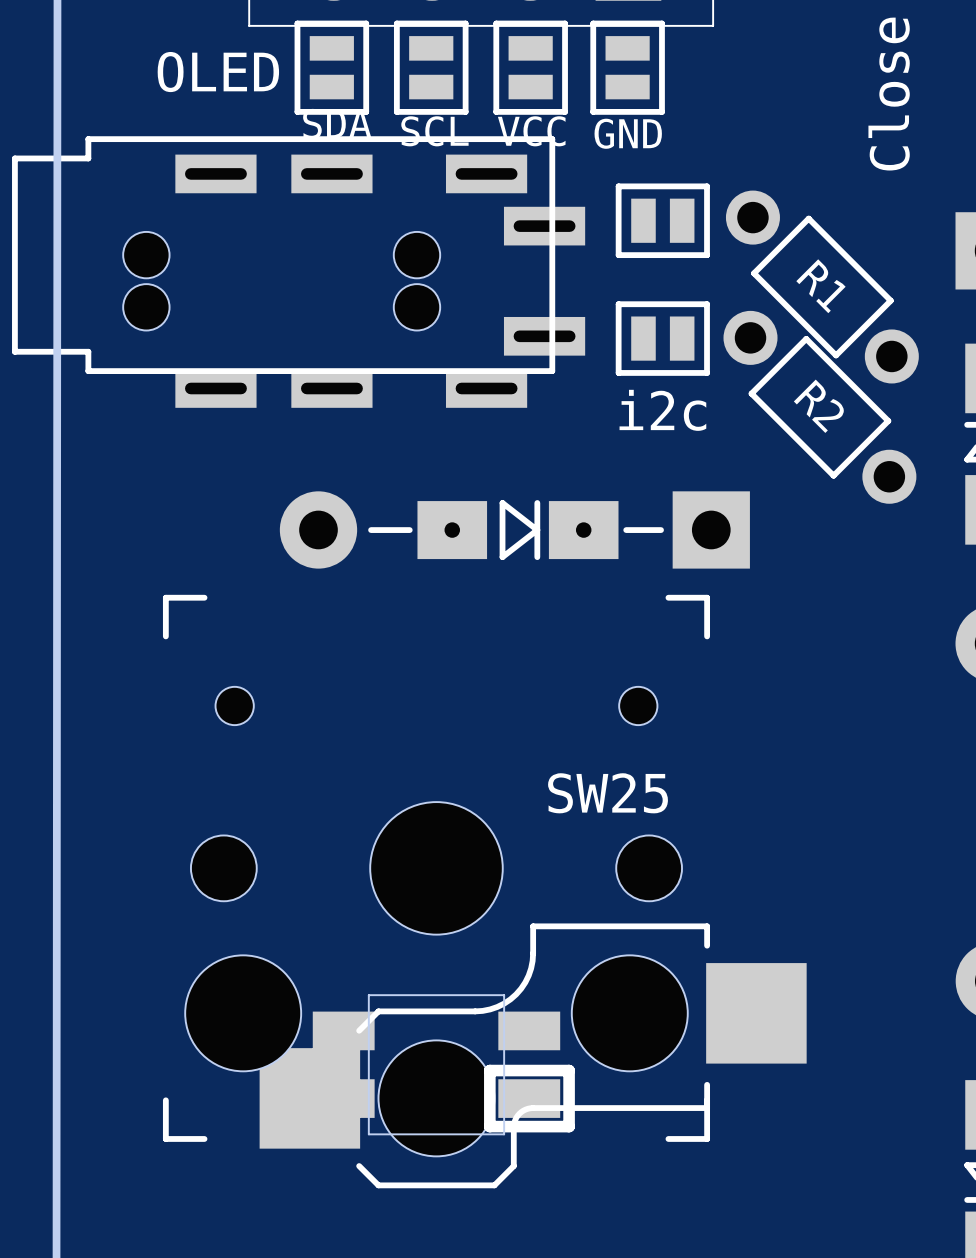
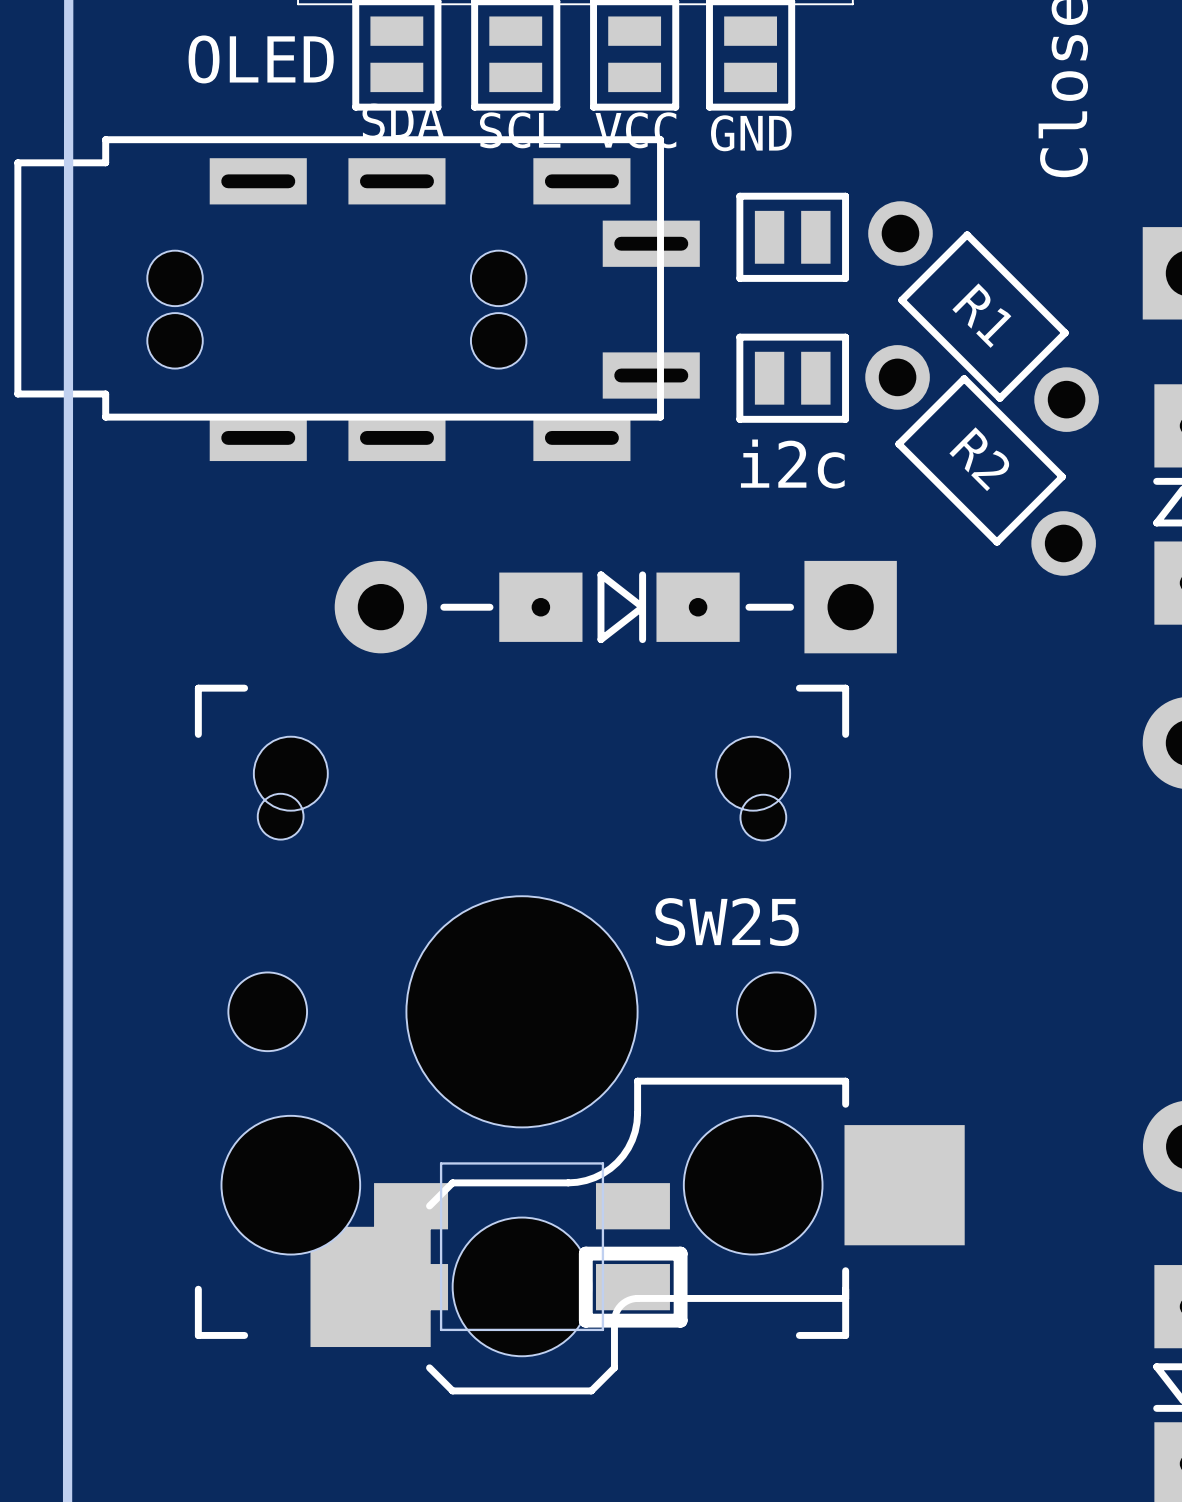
SW25 footprint: [162, 594, 807, 1189] -> [194, 684, 965, 1395]

